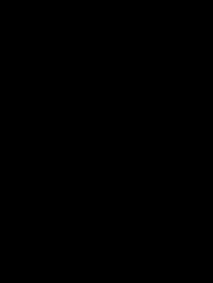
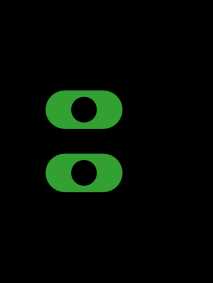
part: none -> (84, 141)

